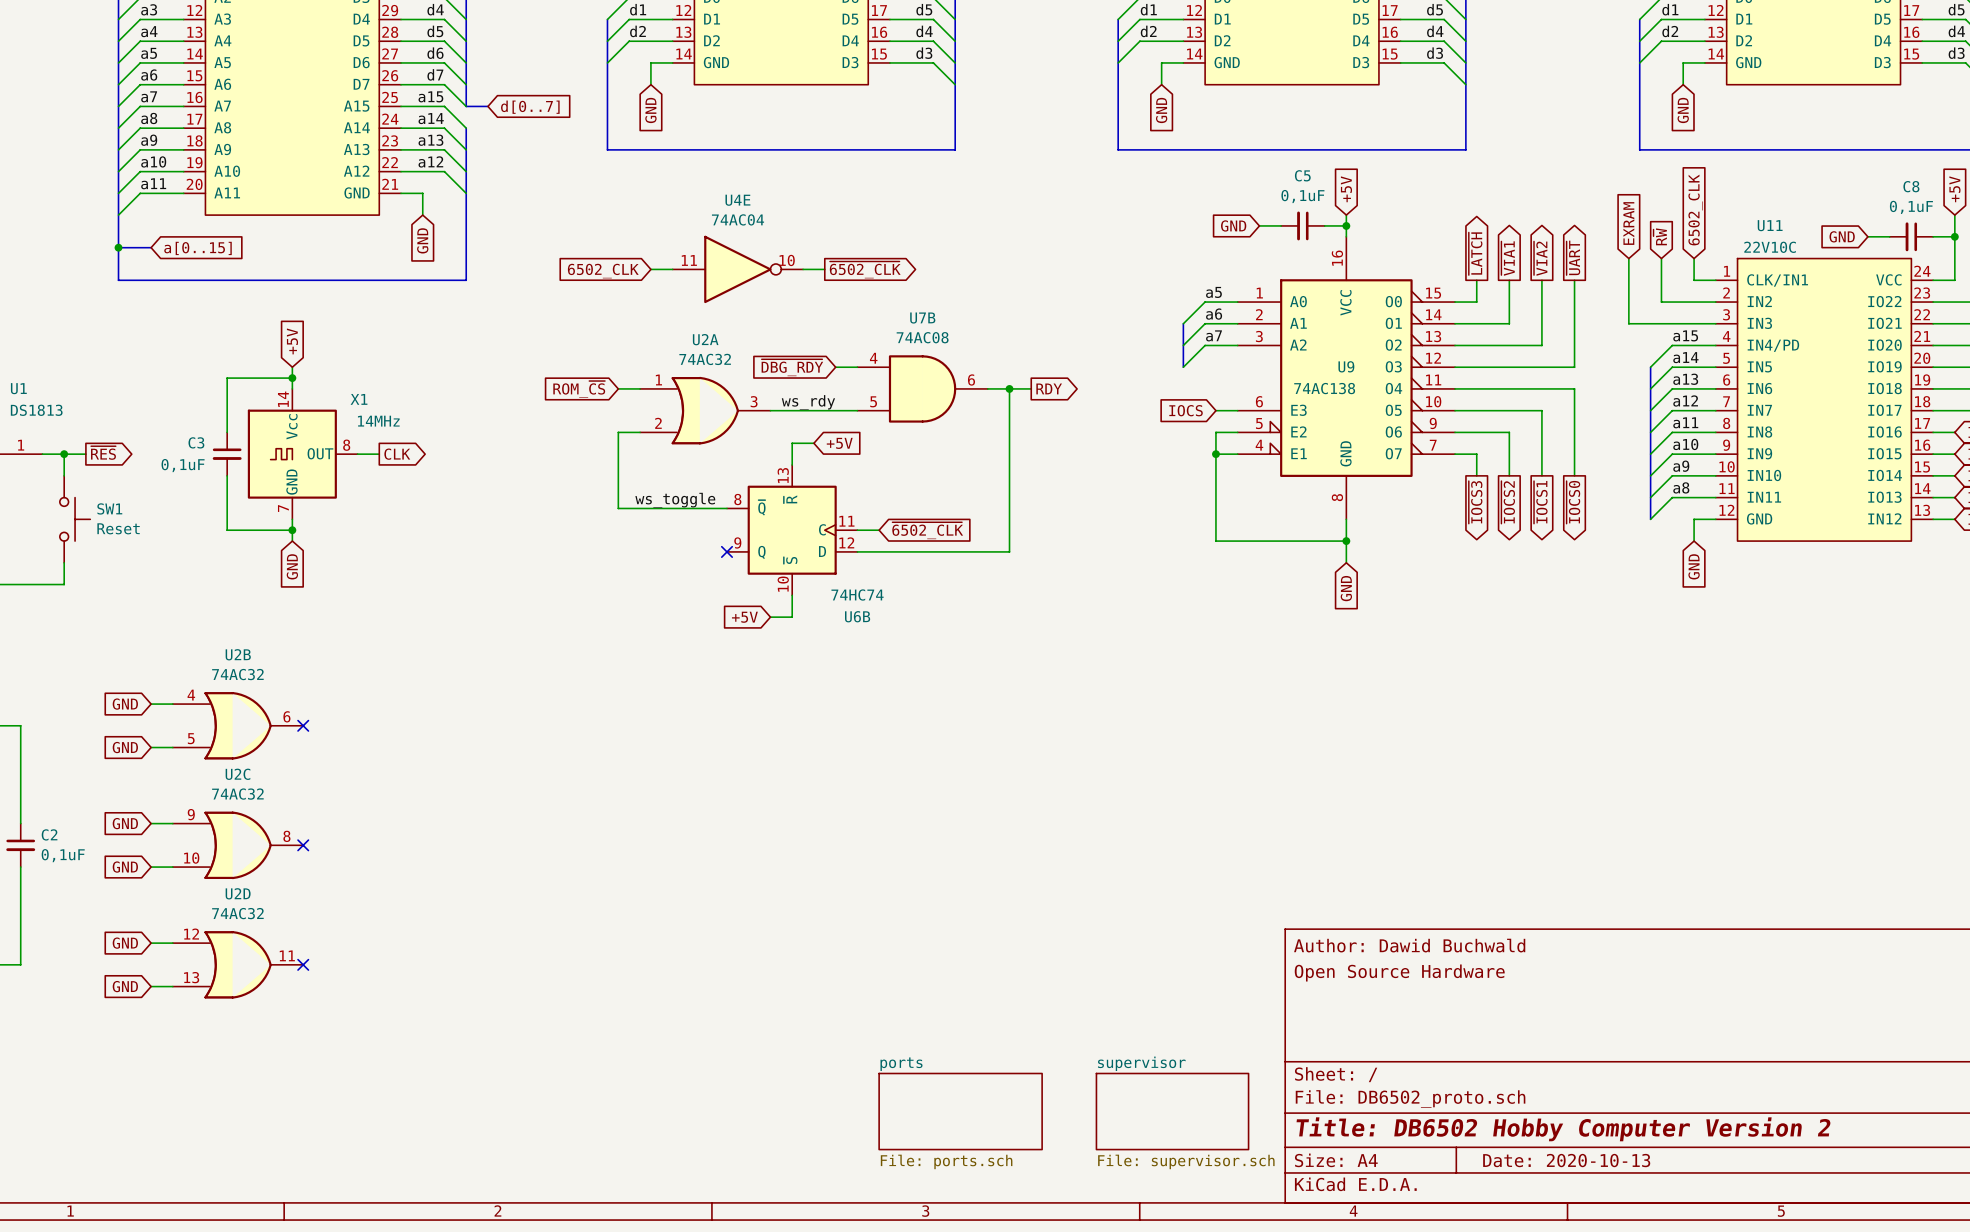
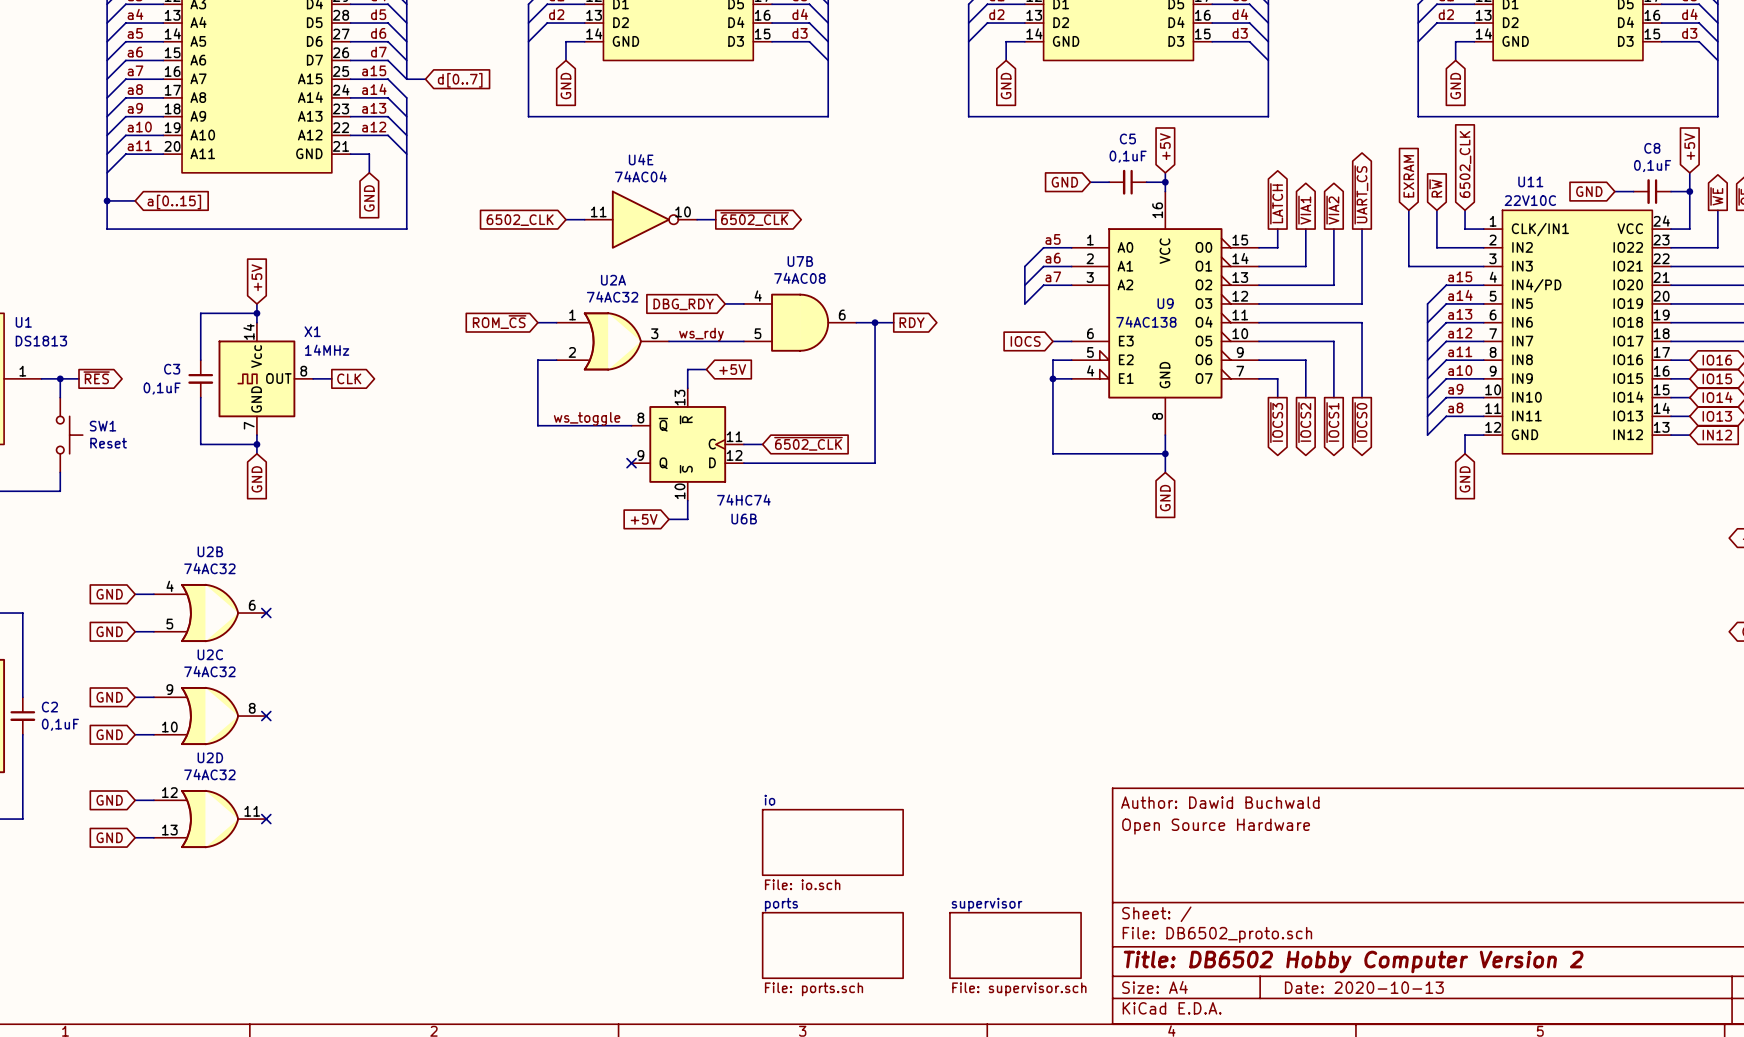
global label: ~{UART} (1573, 257) -> ~{UART_CS} (1361, 194)
global label: ~{DBG_RDY} (792, 367) -> DBG_RDY (683, 304)
sheet io: none -> File: io.sch (832, 842)

